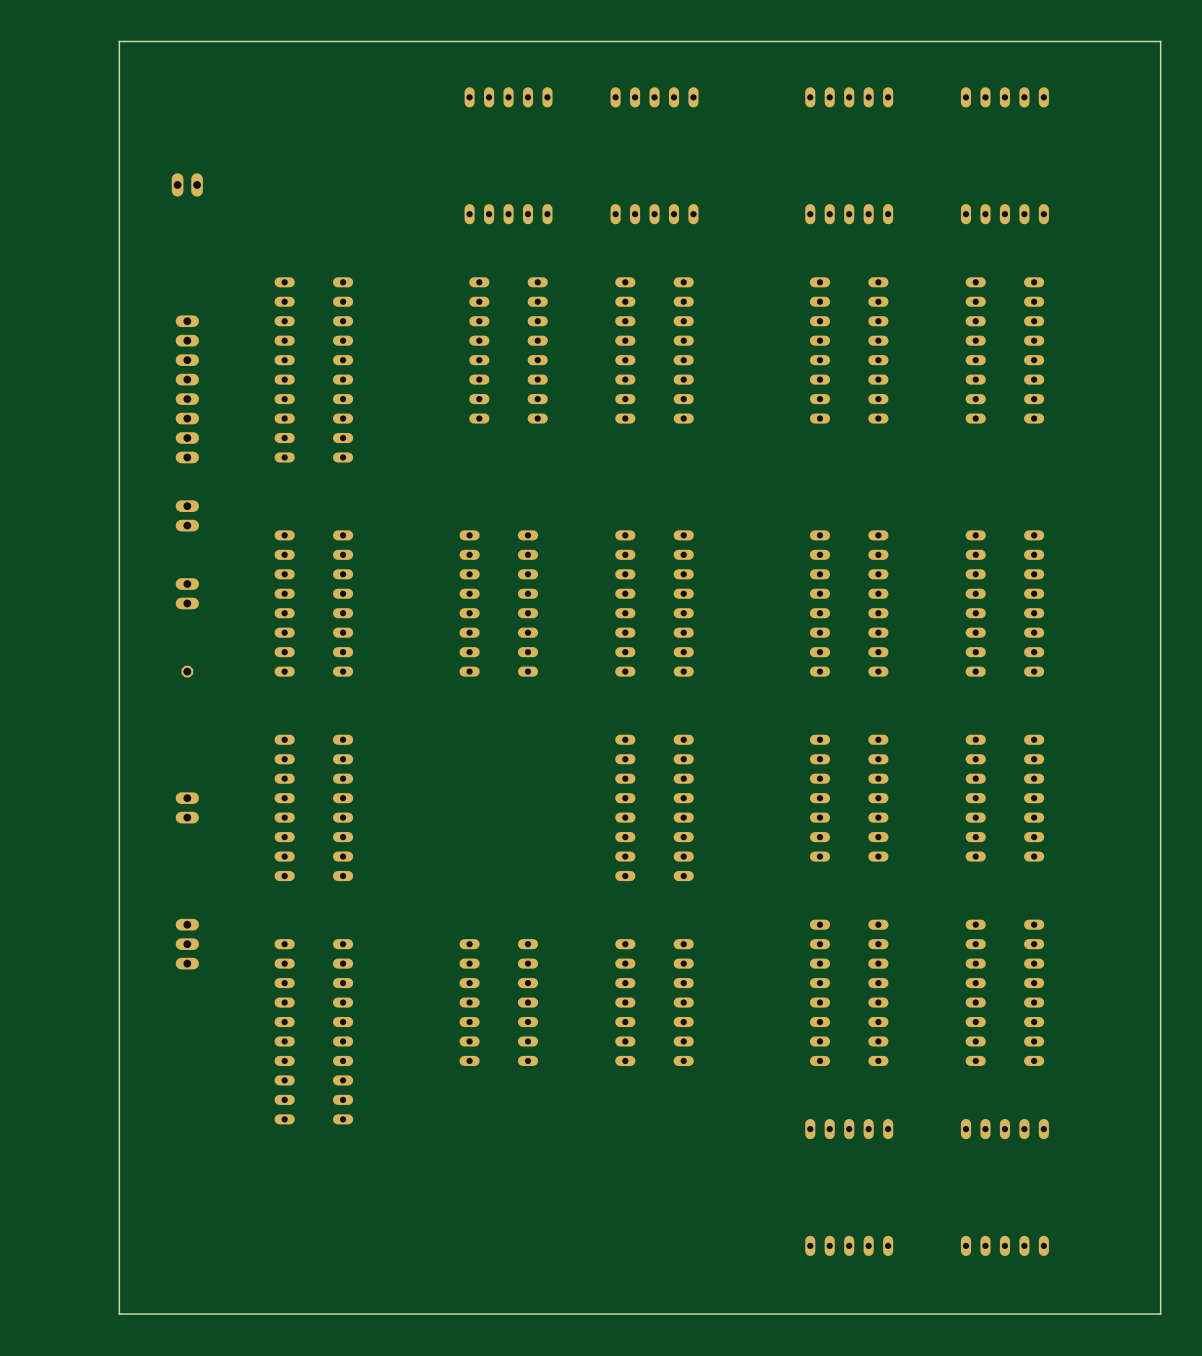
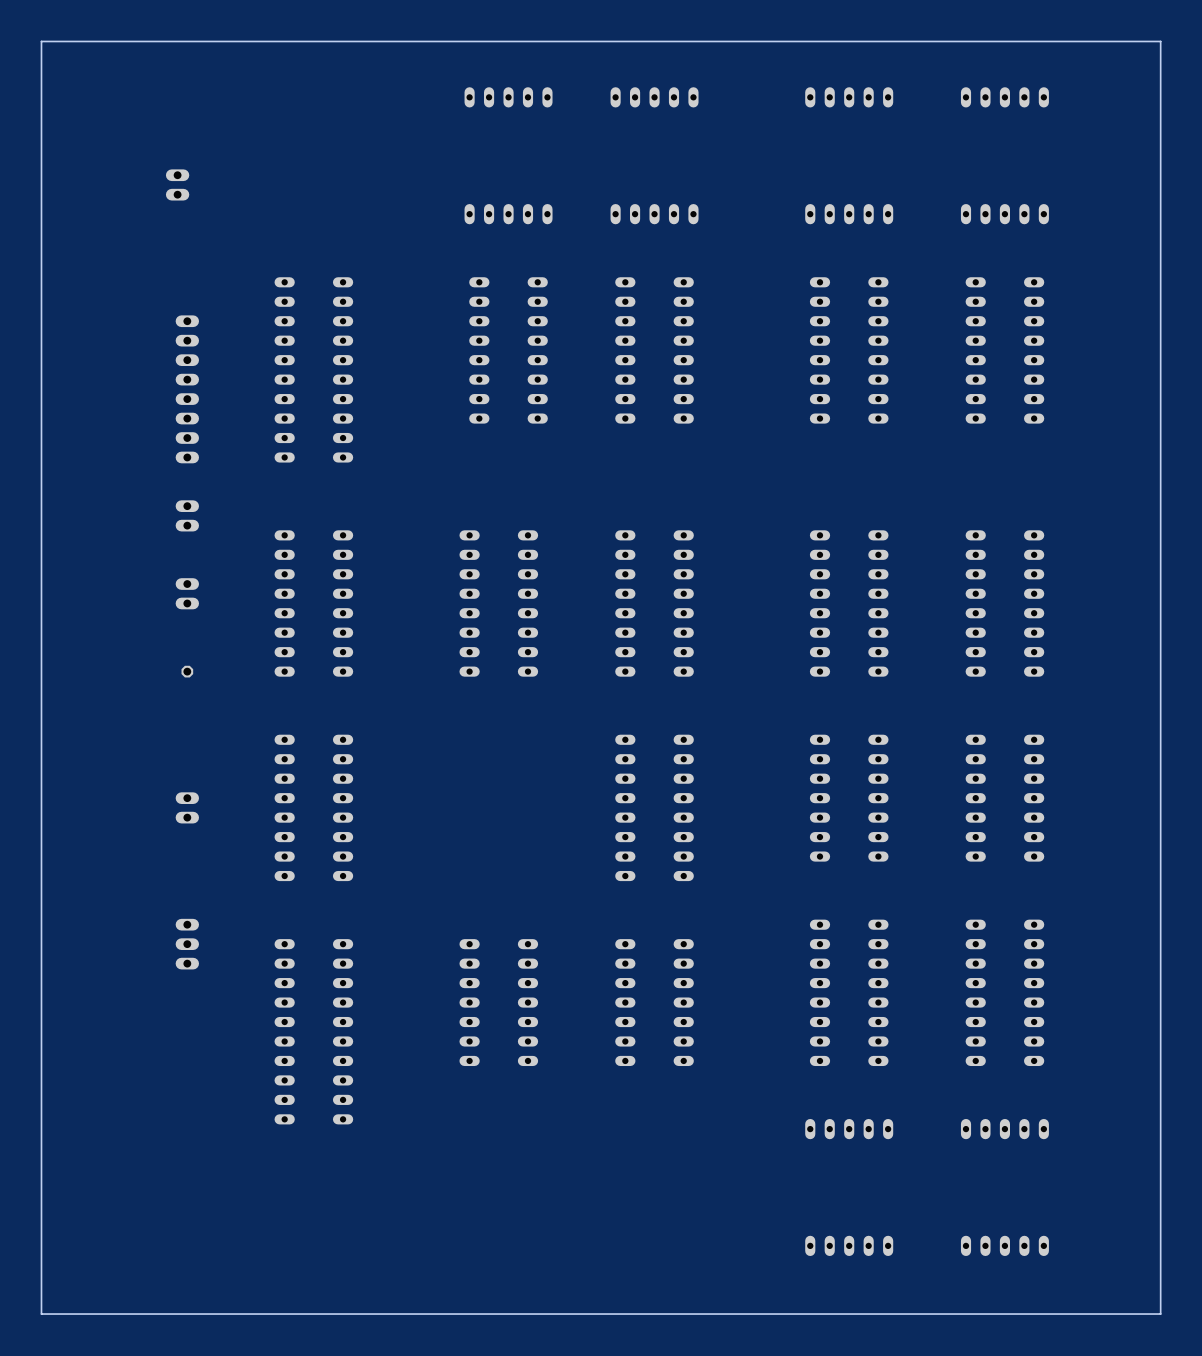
board edge: (119, 41) (119, 1314) -> (119, 41) (41, 41) (41, 1314) (119, 1314)
part rotation: 0° (187, 184) -> 90° clockwise (177, 184)

